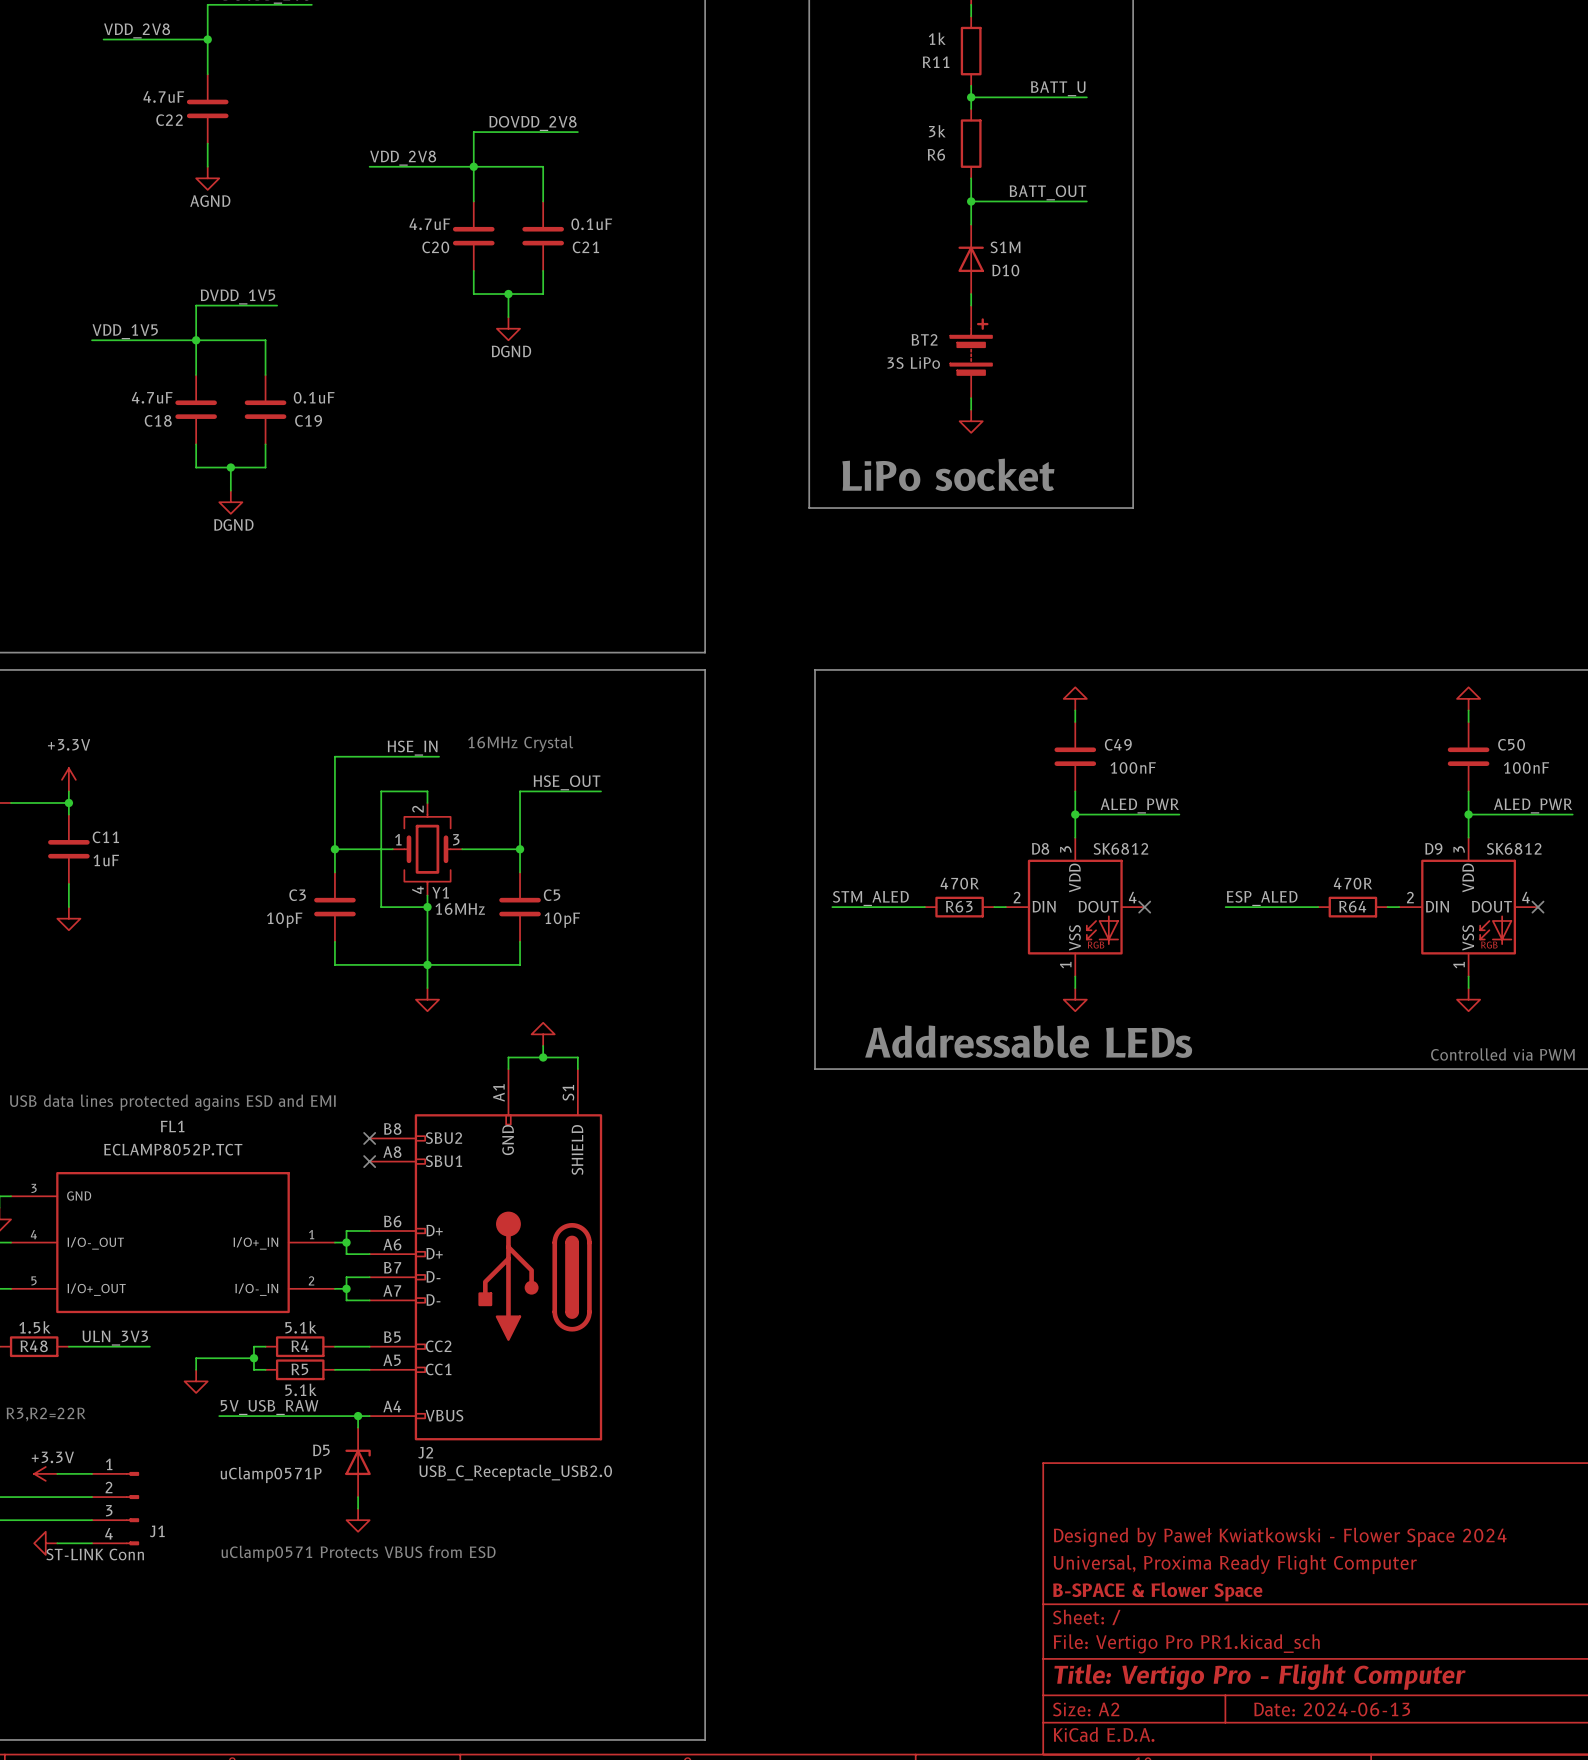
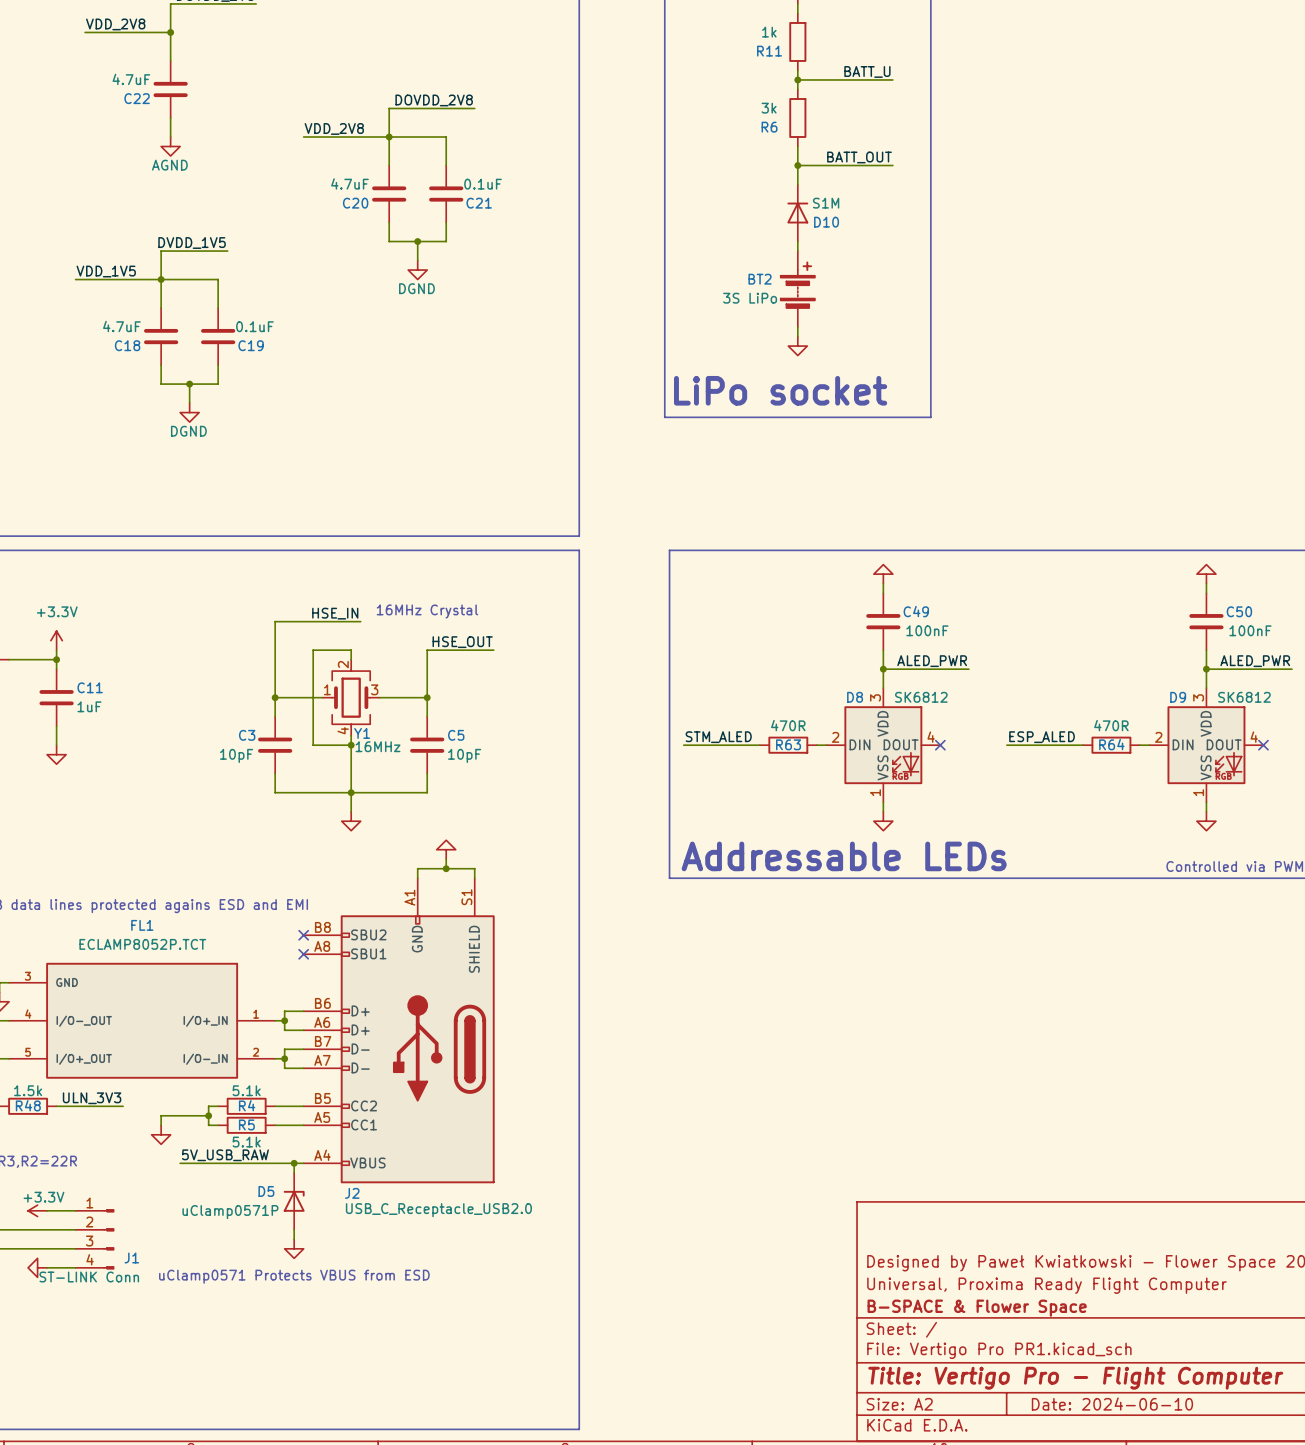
title block: Date: 2024-06-13 (1332, 1709) -> Date: 2024-06-10 (1112, 1404)

